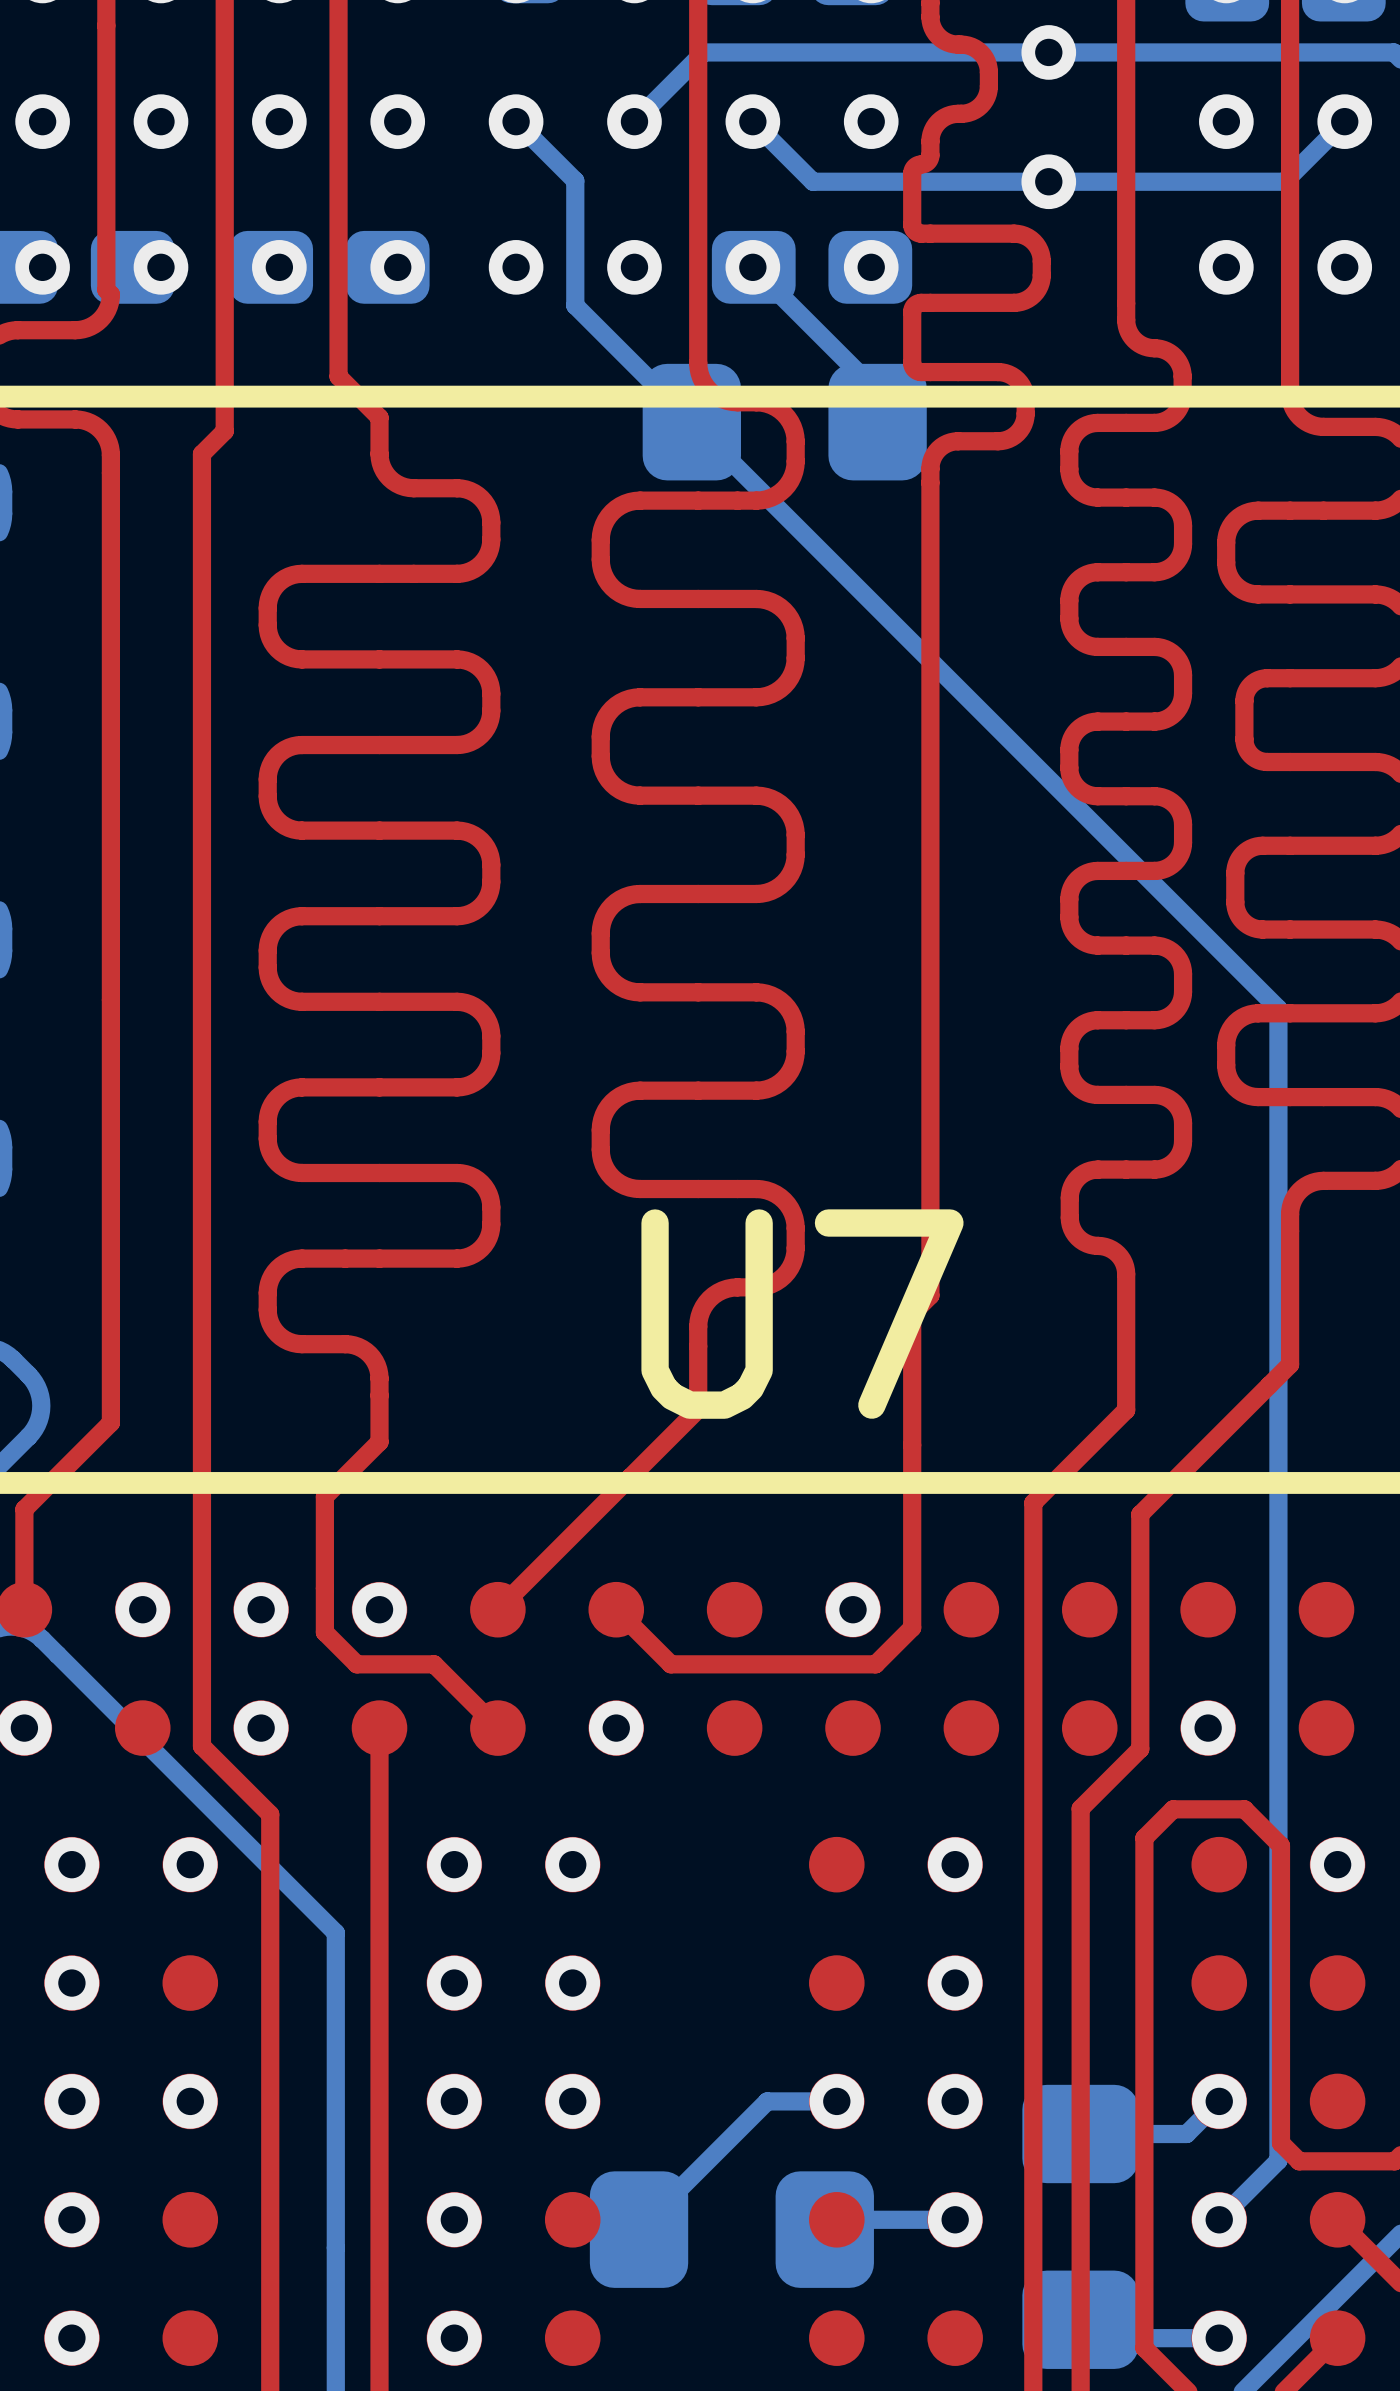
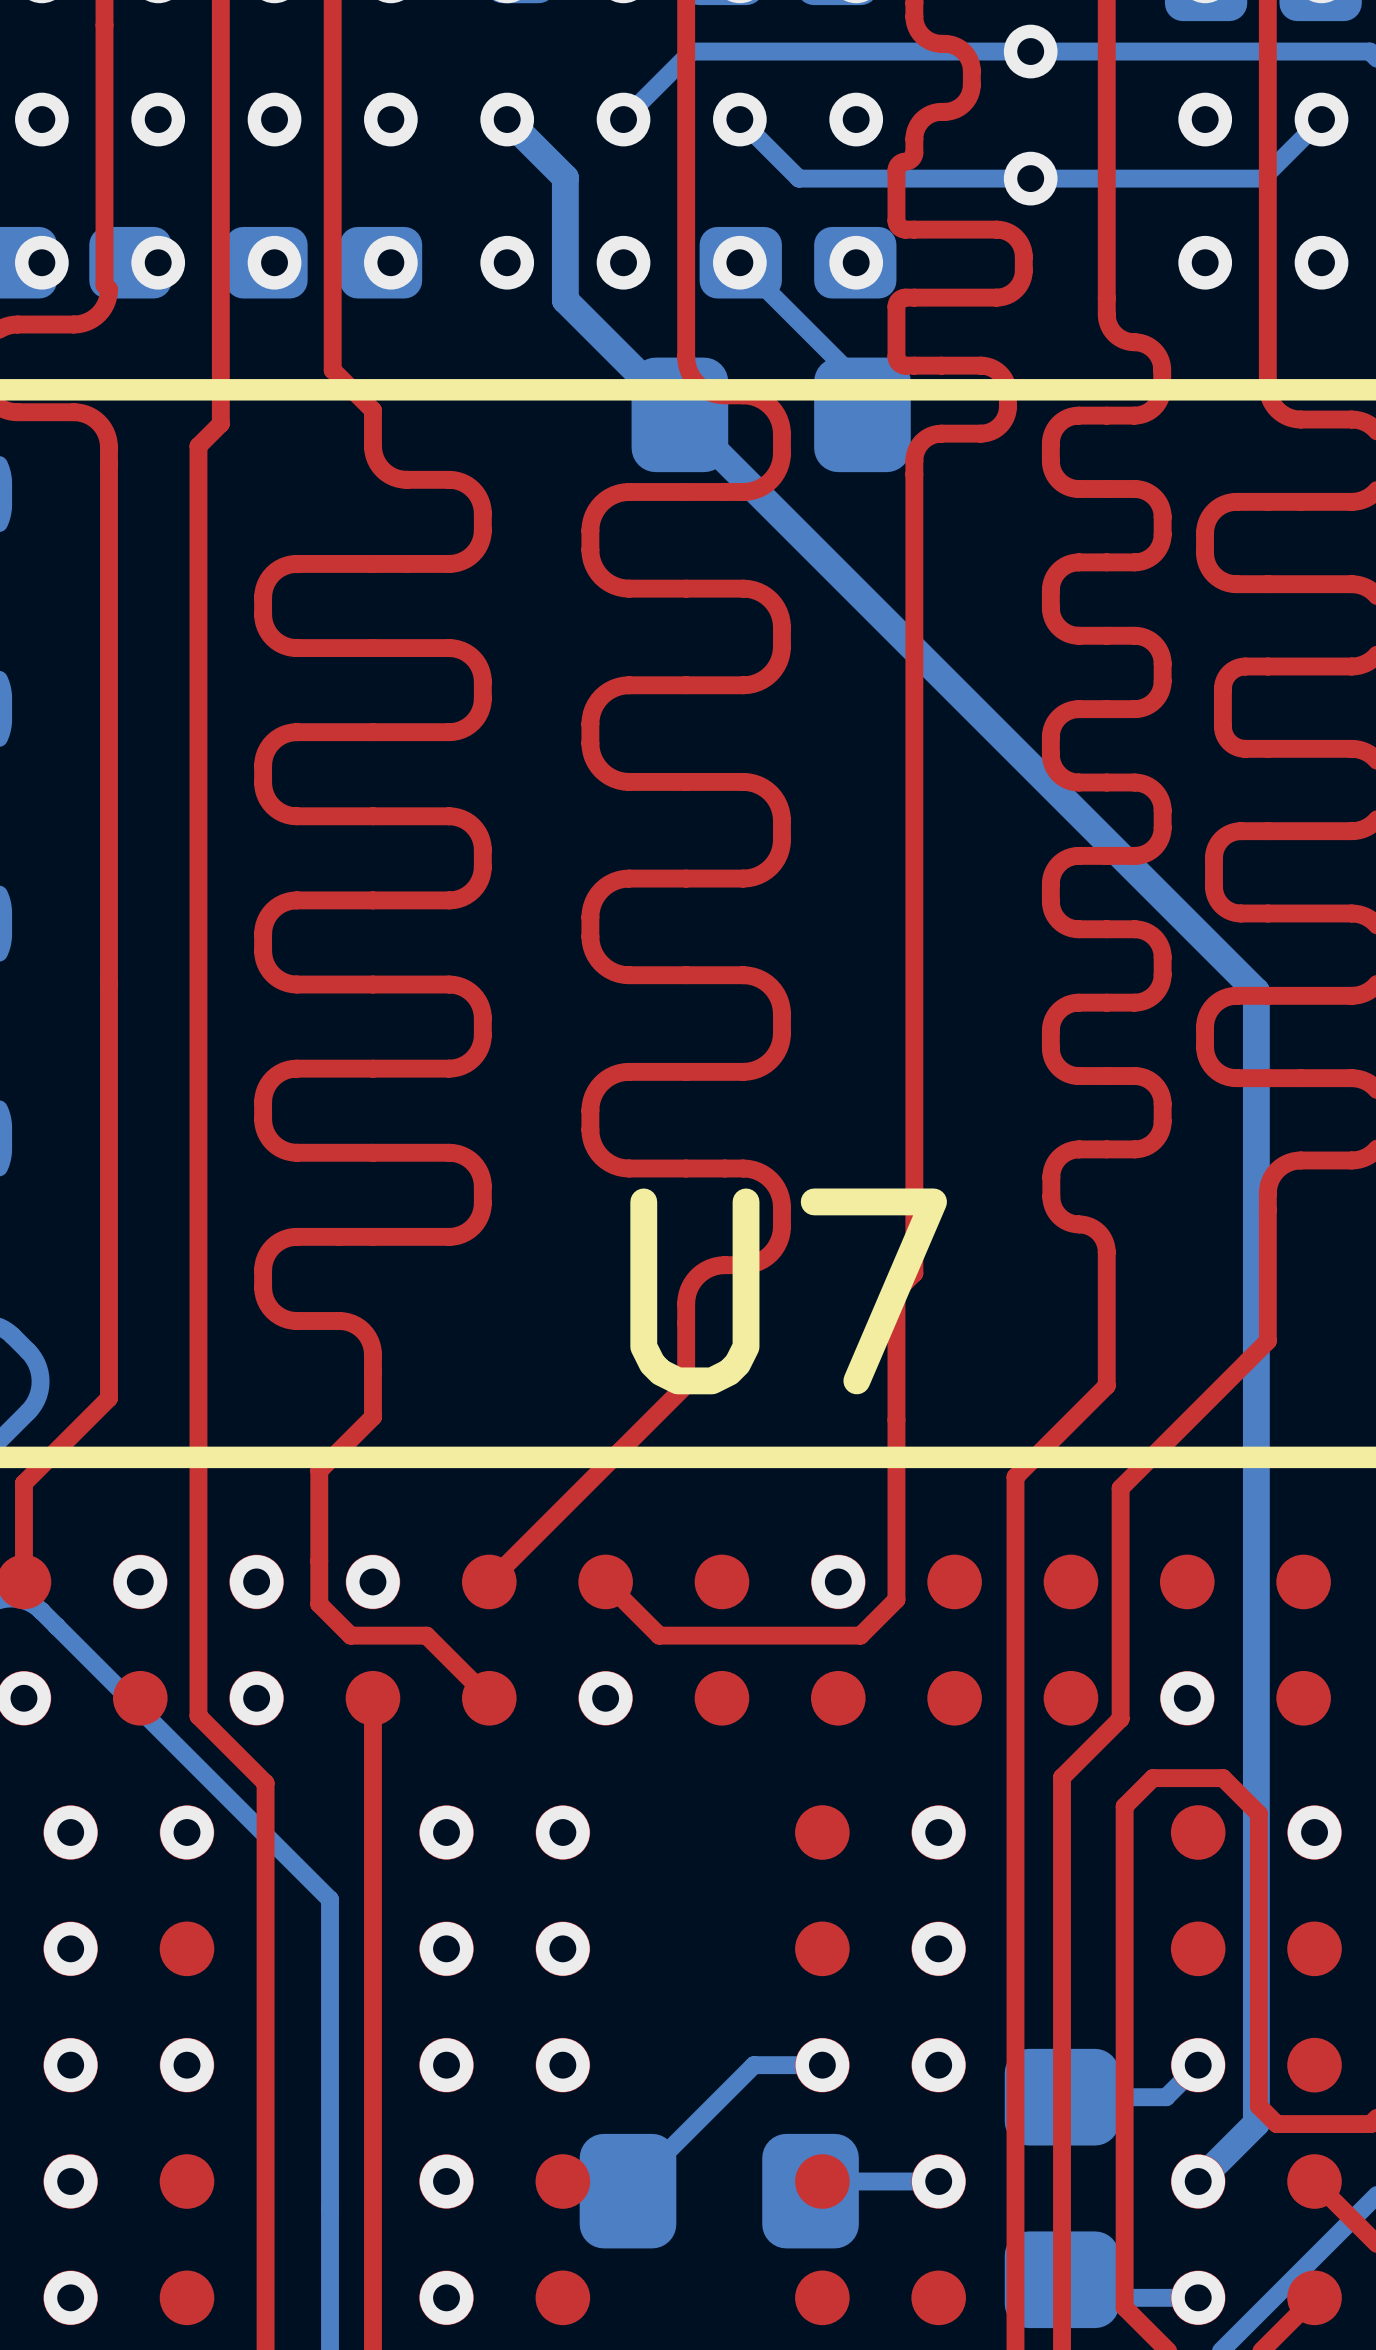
bottom track width: thin (516, 121) (575, 180) (575, 305) (1278, 1008) (1278, 2160) (1219, 2219) -> thick (507, 119) (565, 177) (565, 300) (1256, 991) (1256, 2123) (1198, 2181)

